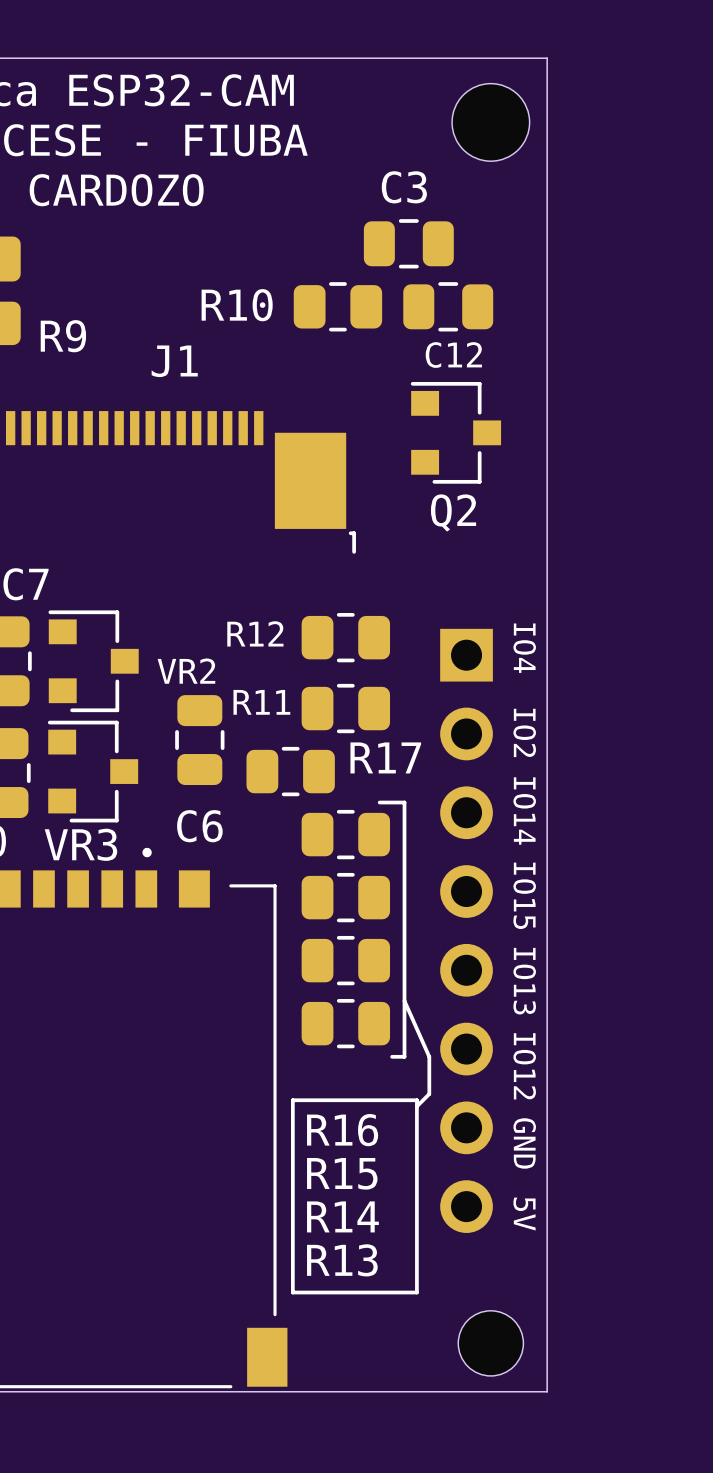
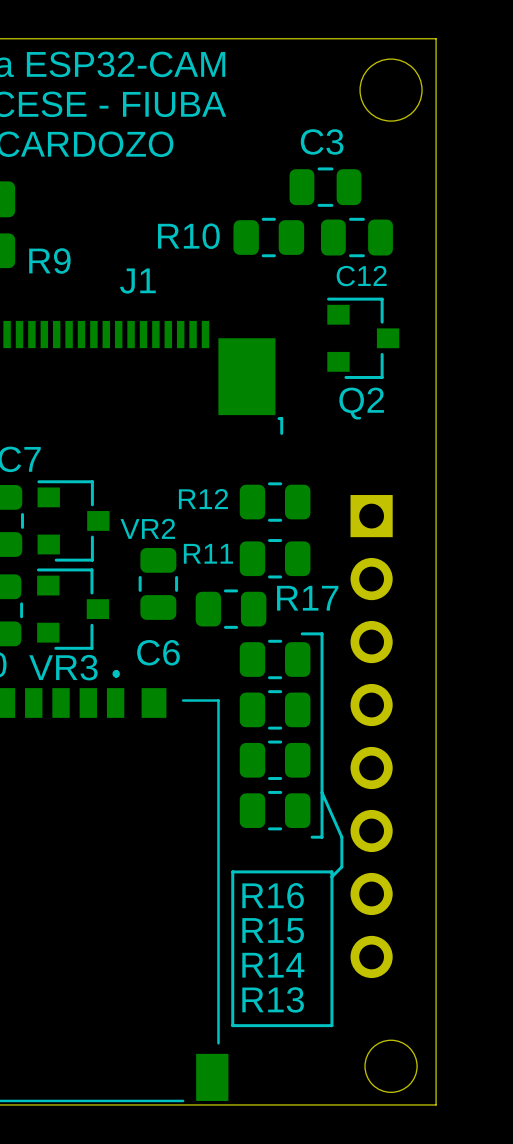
text: IO4 (524, 648) -> none
text: IO2 (524, 732) -> none
text: IO14 (524, 811) -> none
text: IO15 (524, 895) -> none
text: IO13 (524, 981) -> none
text: IO12 (524, 1066) -> none
text: GND (524, 1143) -> none
text: 5V (524, 1214) -> none

